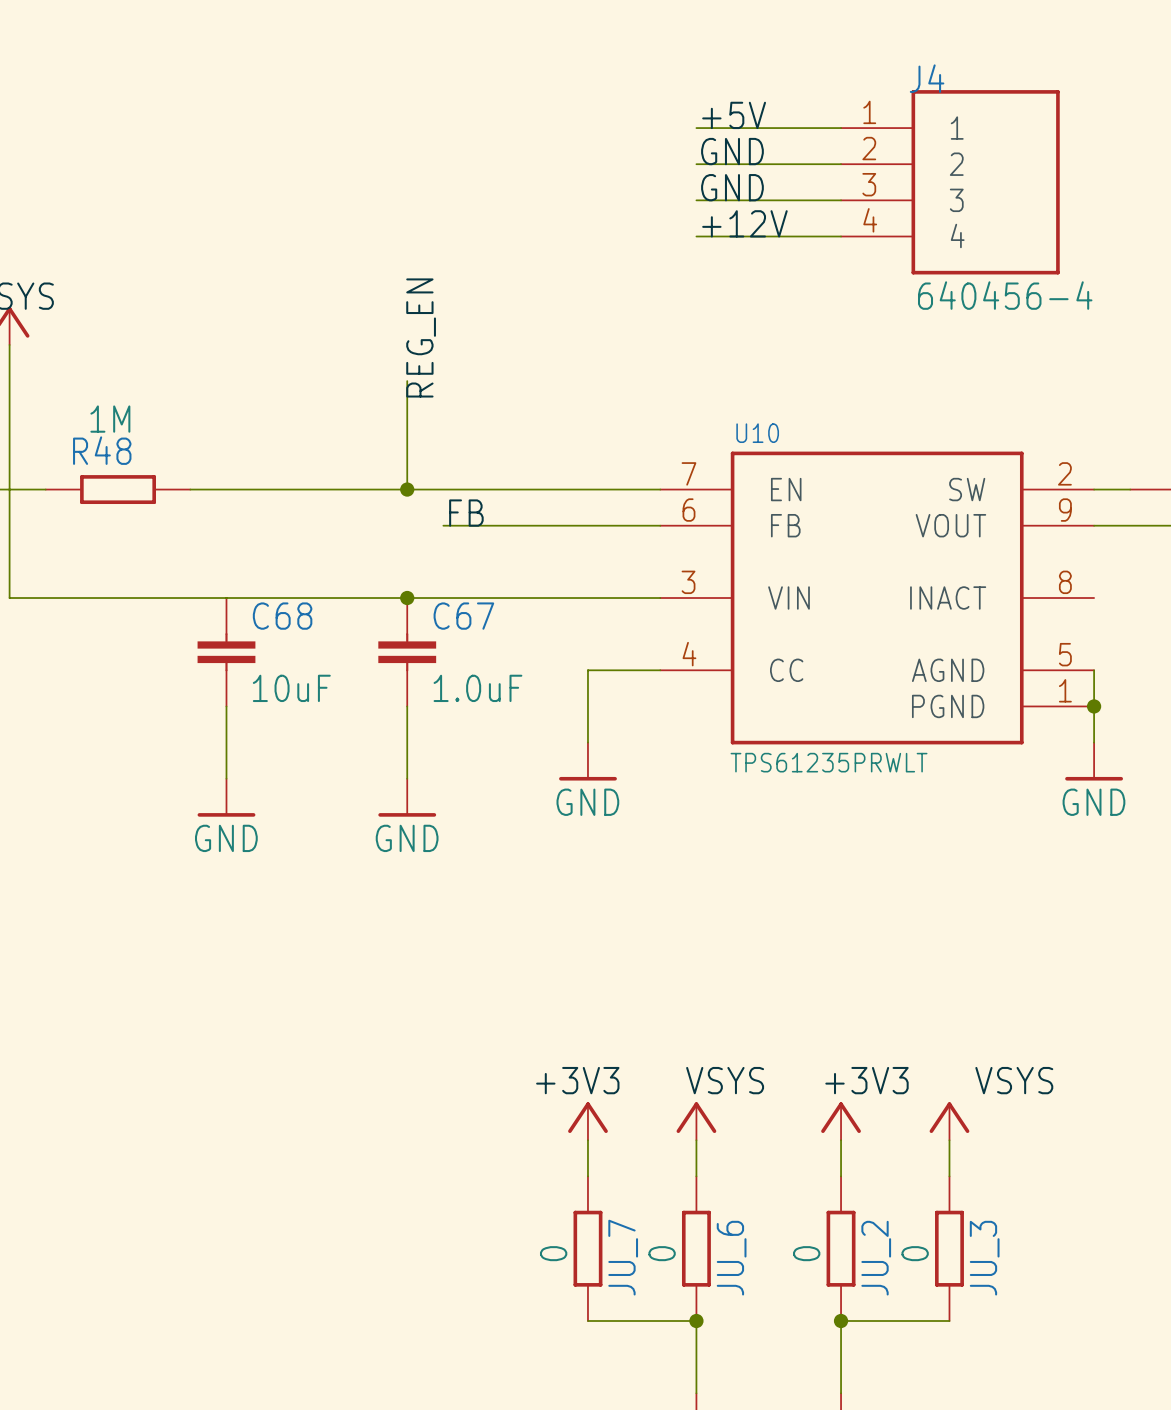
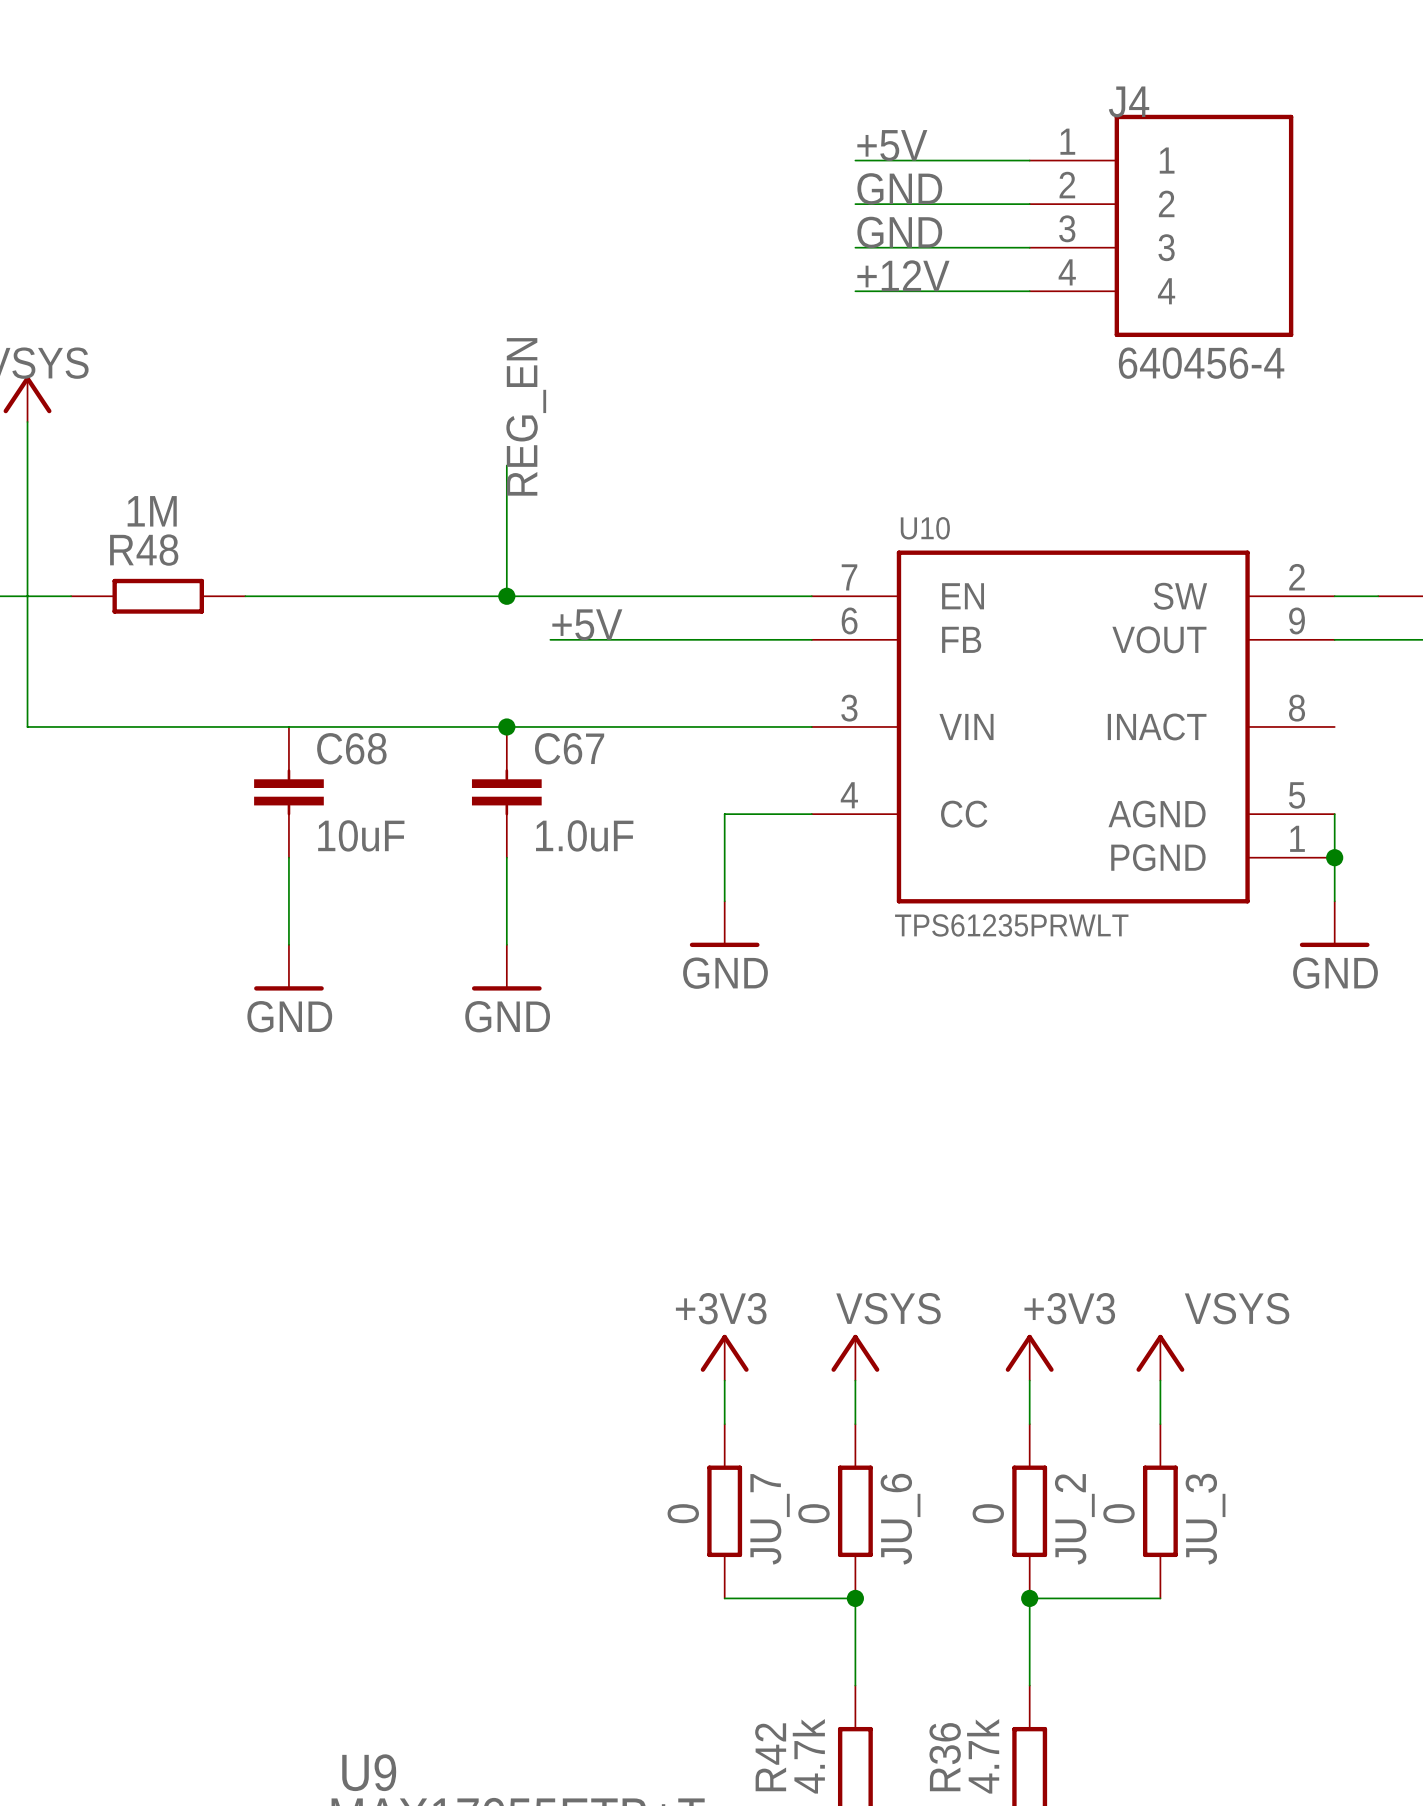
label: FB (466, 513) -> +5V (587, 624)

